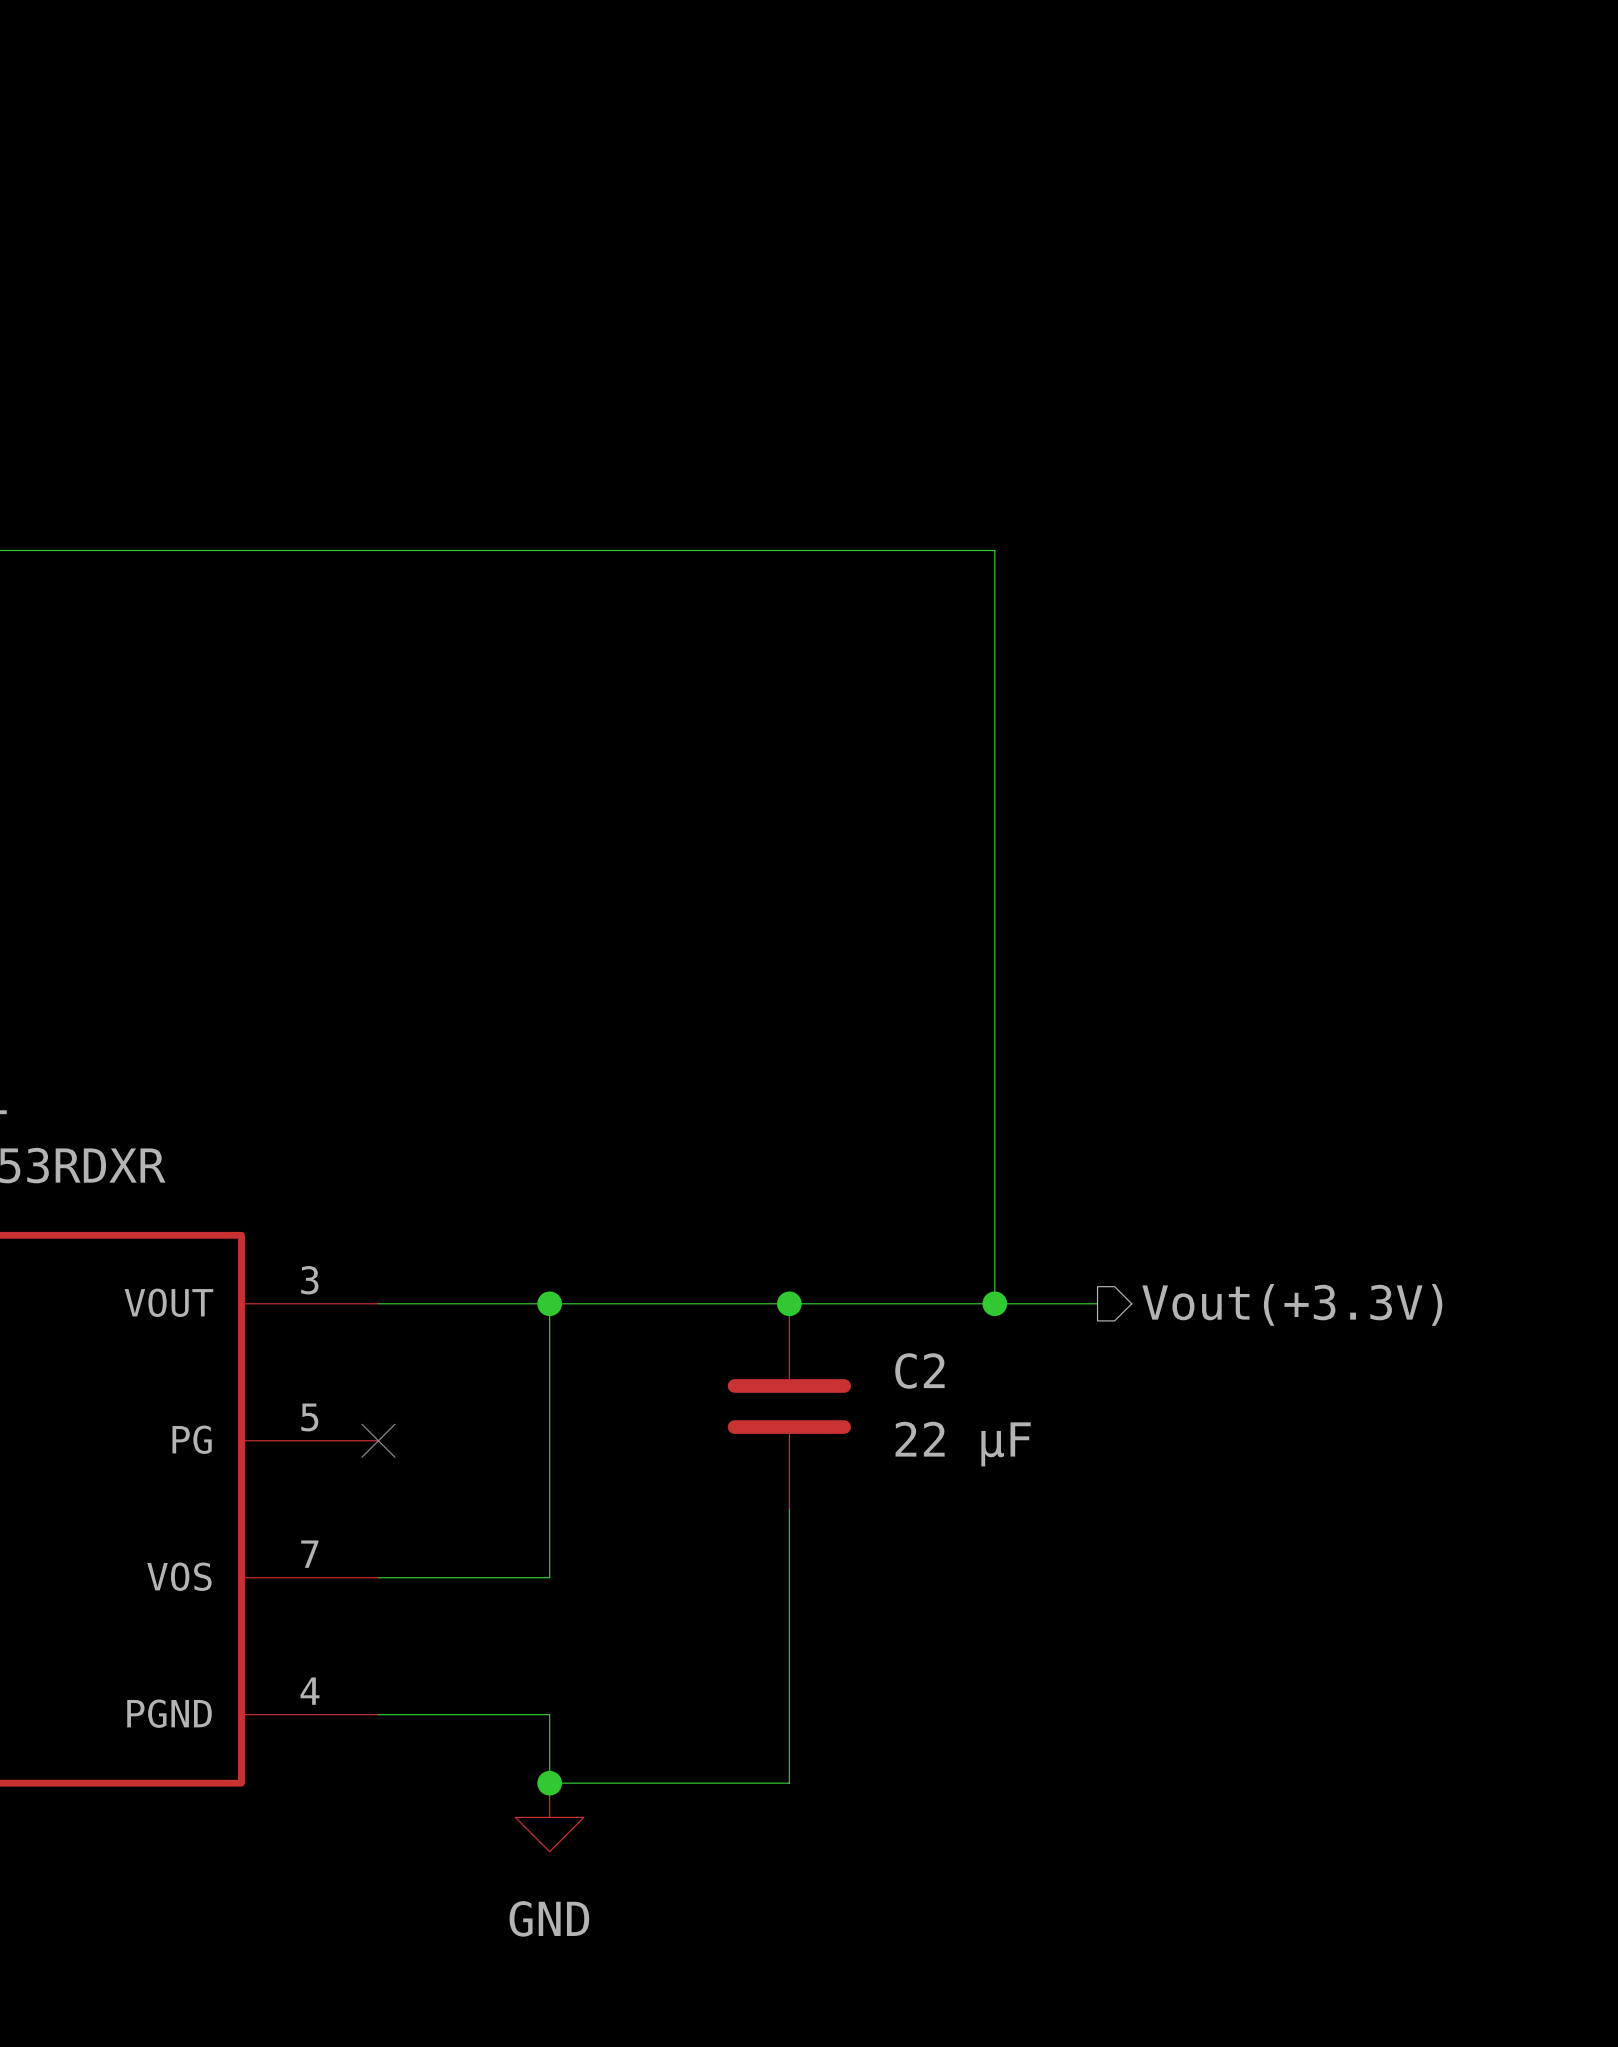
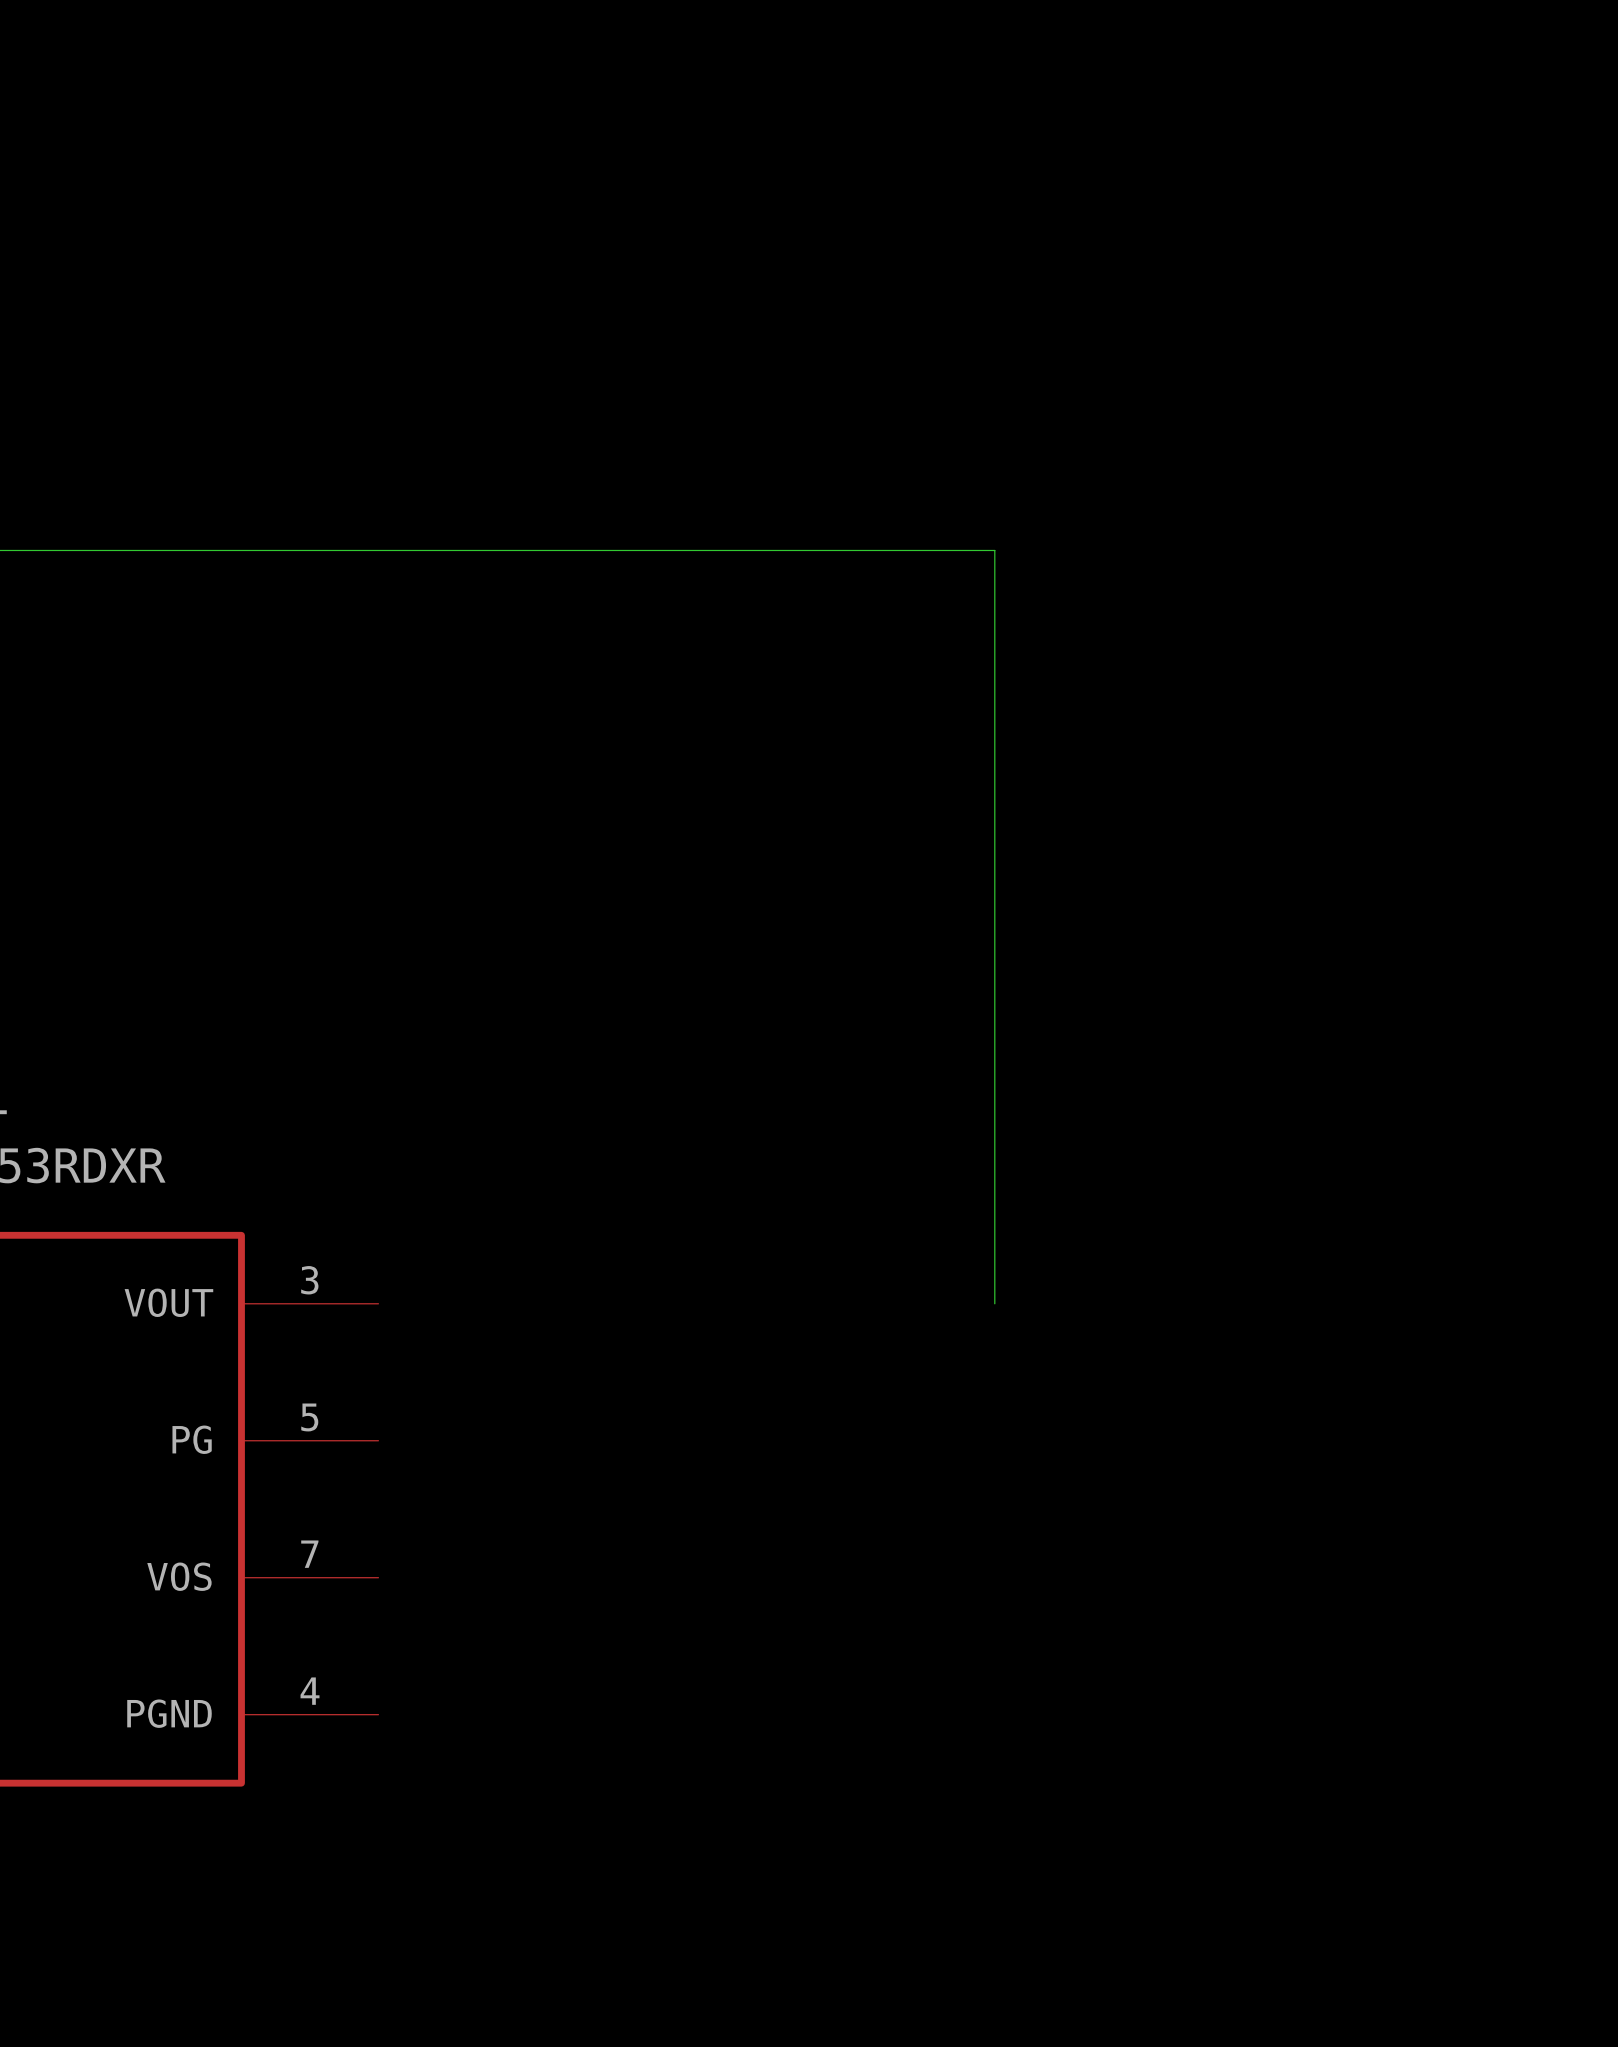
wire: (378, 1303) (1097, 1303) -> none
wire: (549, 1303) (549, 1577) (378, 1577) -> none
junction: (549, 1303) -> none
junction: (789, 1303) -> none
junction: (994, 1303) -> none
hierarchical label: Vout(+3.3V) (1292, 1304) -> none
C2: 22 µF (789, 1406) -> none
no-connect mark: (378, 1440) -> none
wire: (789, 1509) (789, 1783) (549, 1783) (549, 1714) (378, 1714) -> none
junction: (549, 1783) -> none
power symbol: GND (549, 1817) -> none

